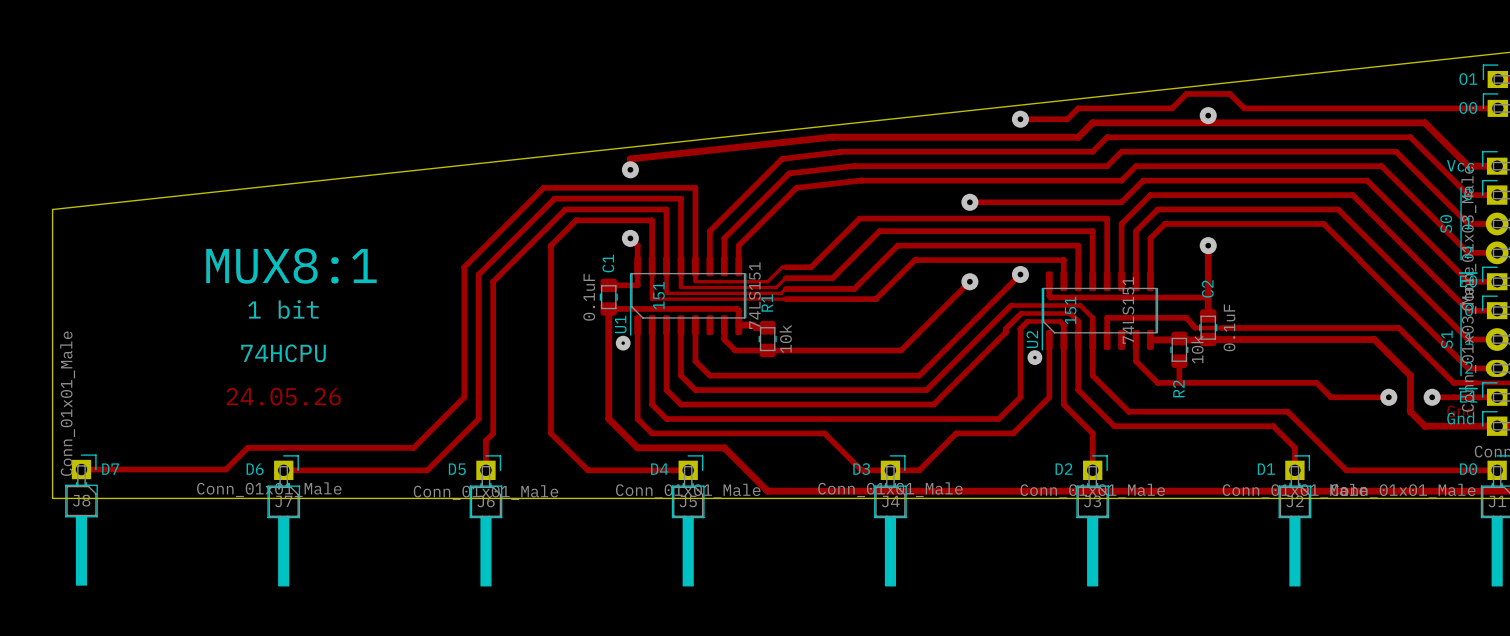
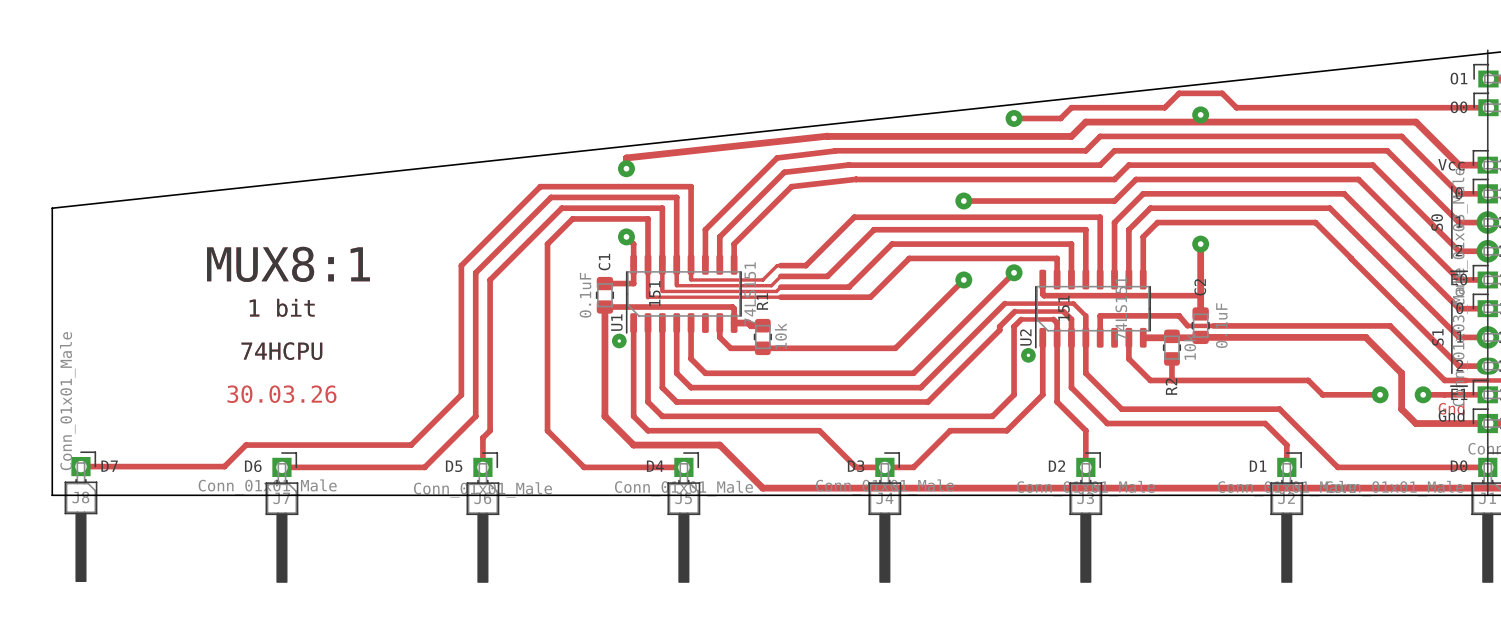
line: none -> (1487, 50) (1487, 495)
text: 24.05.26 (283, 396) -> 30.03.26 (281, 394)

